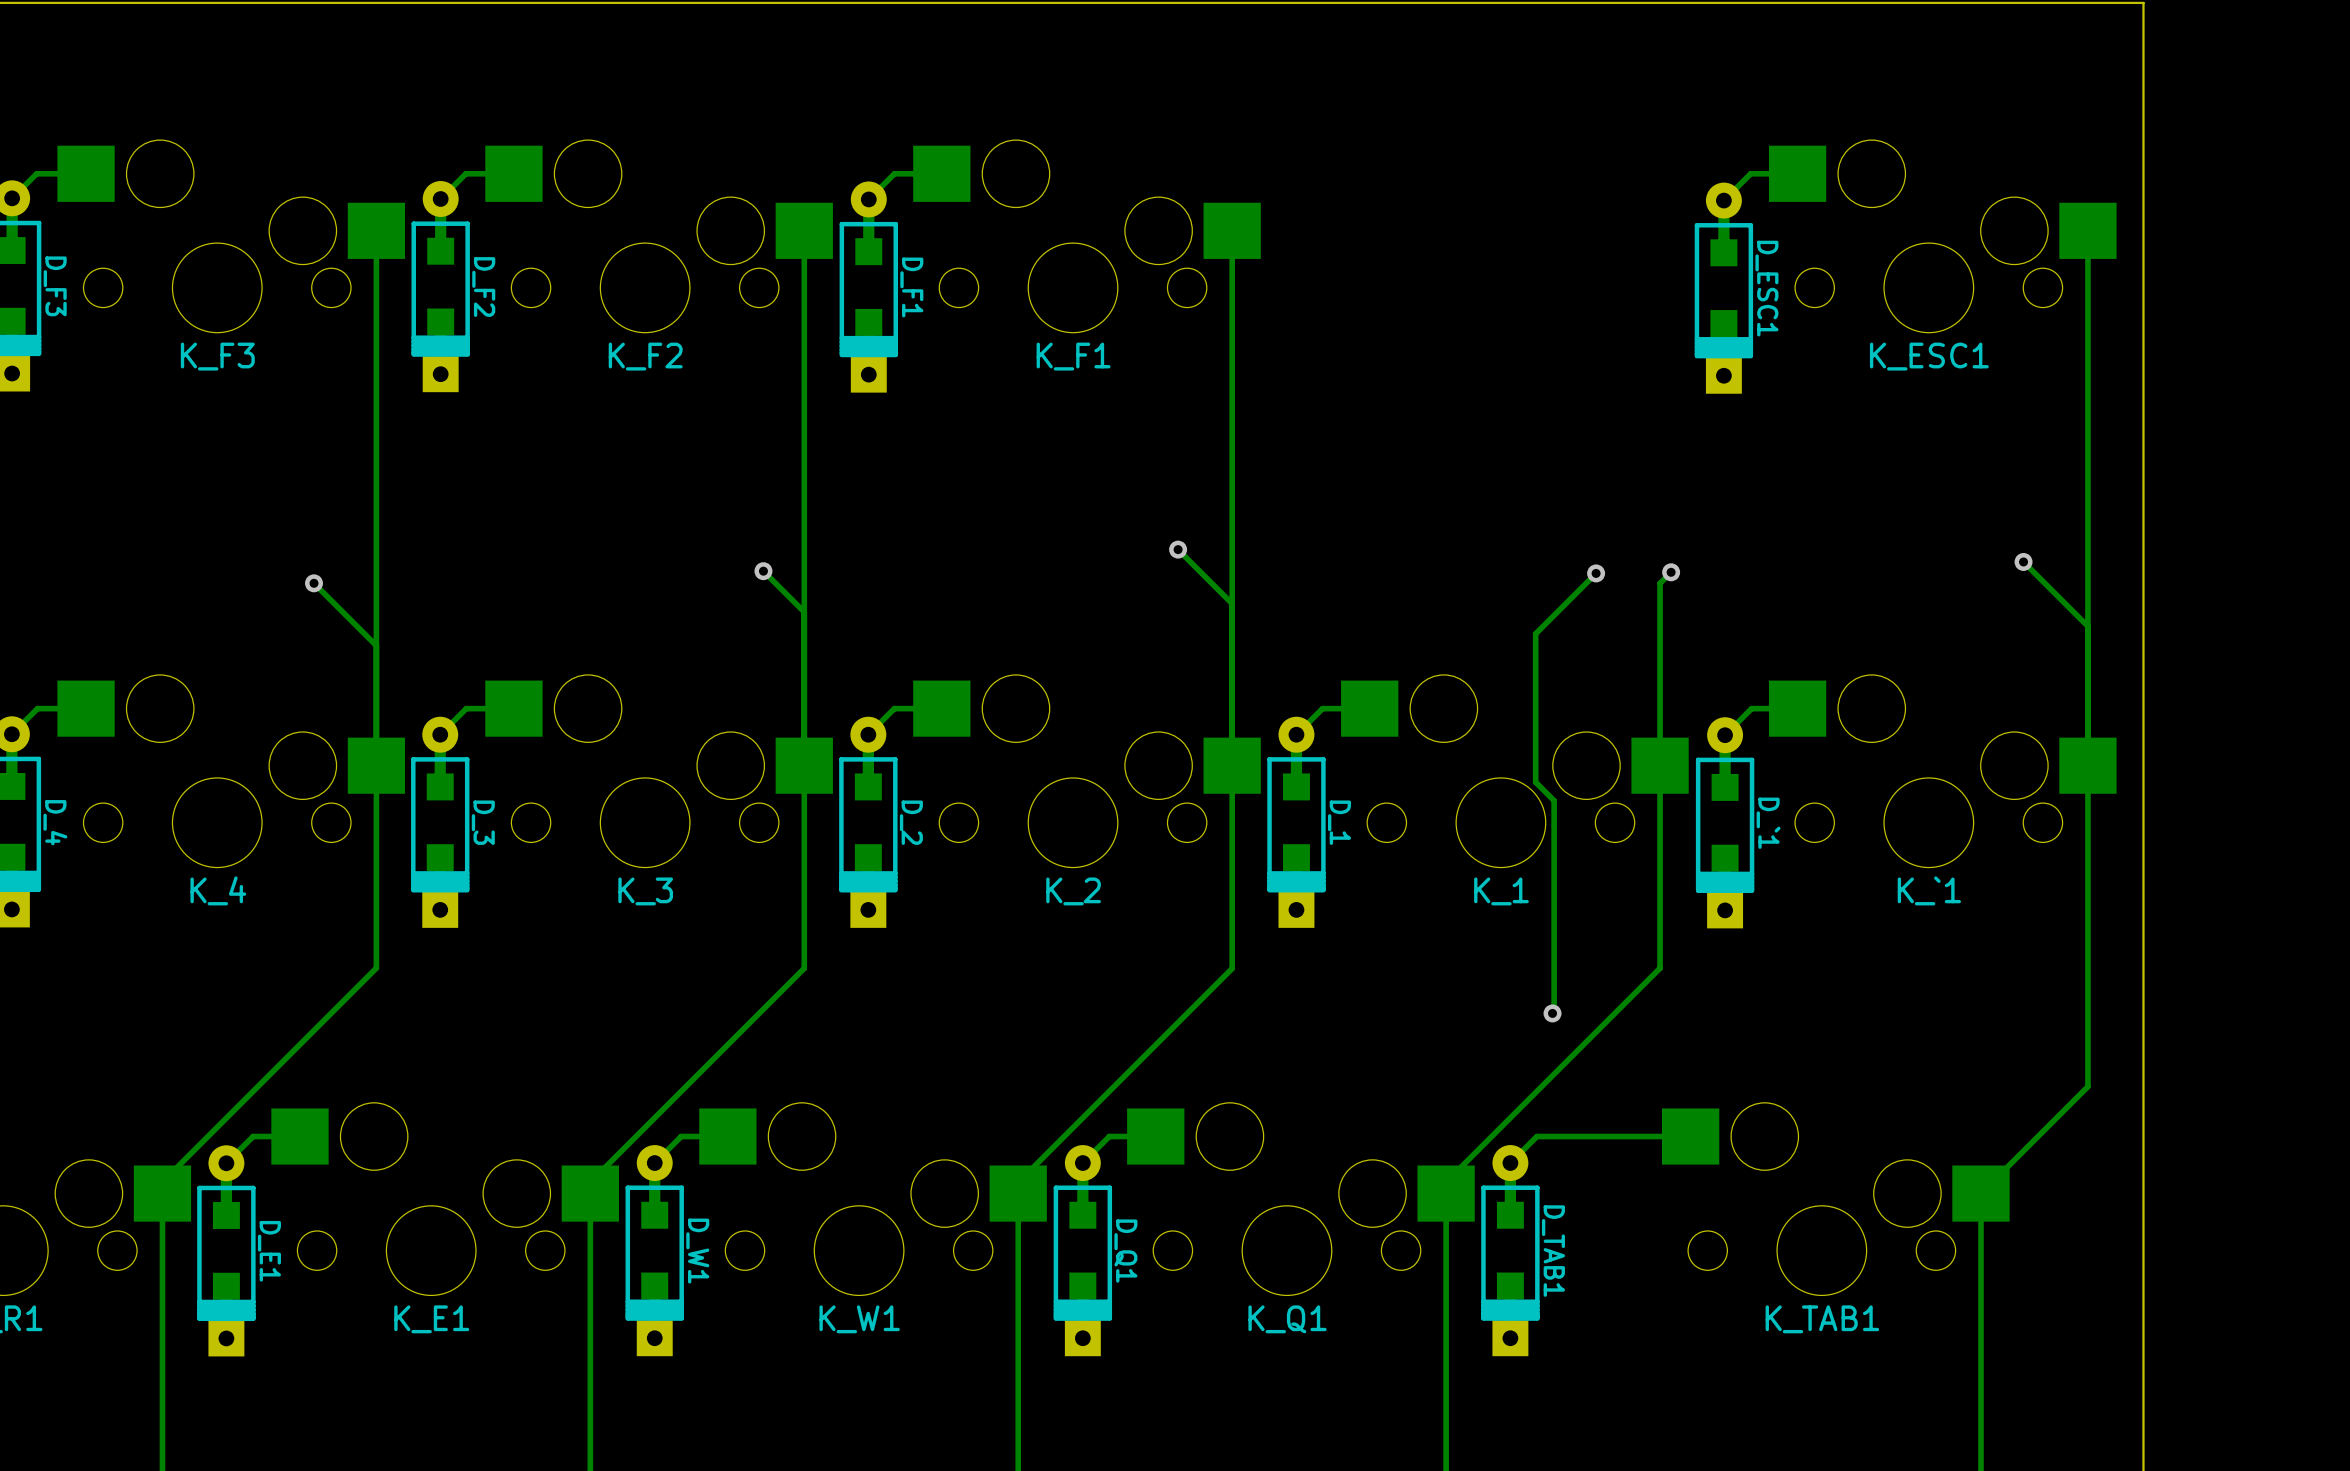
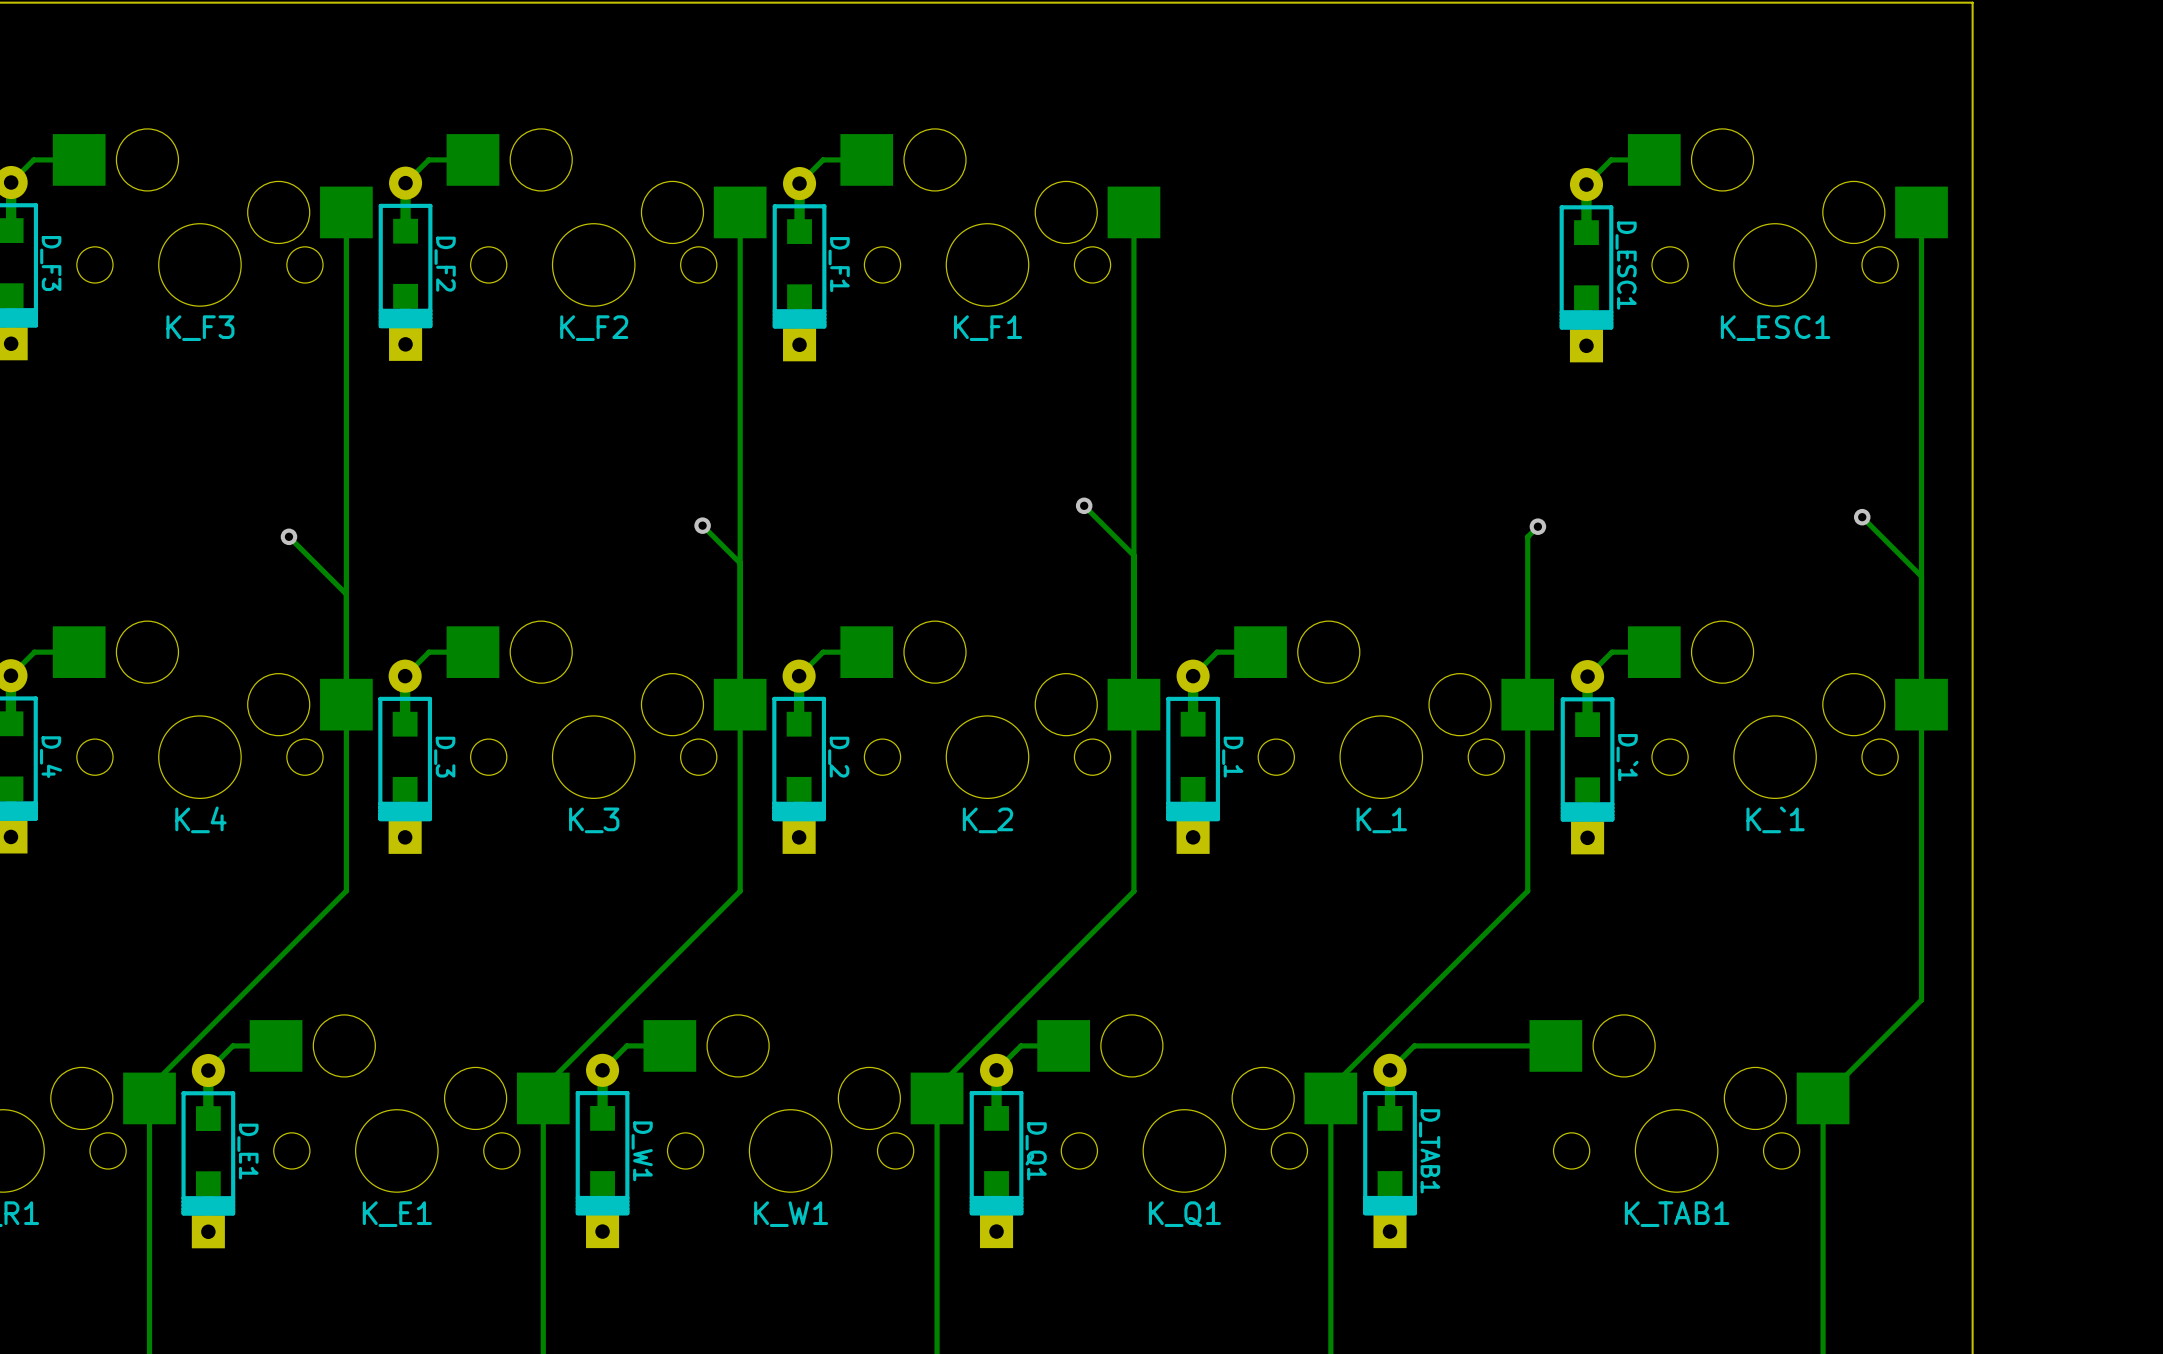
track: (1596, 573) (1535, 633) (1535, 782) (1554, 800) (1554, 1011) (1552, 1013) -> none
via: (1596, 573) -> none
via: (1552, 1013) -> none

